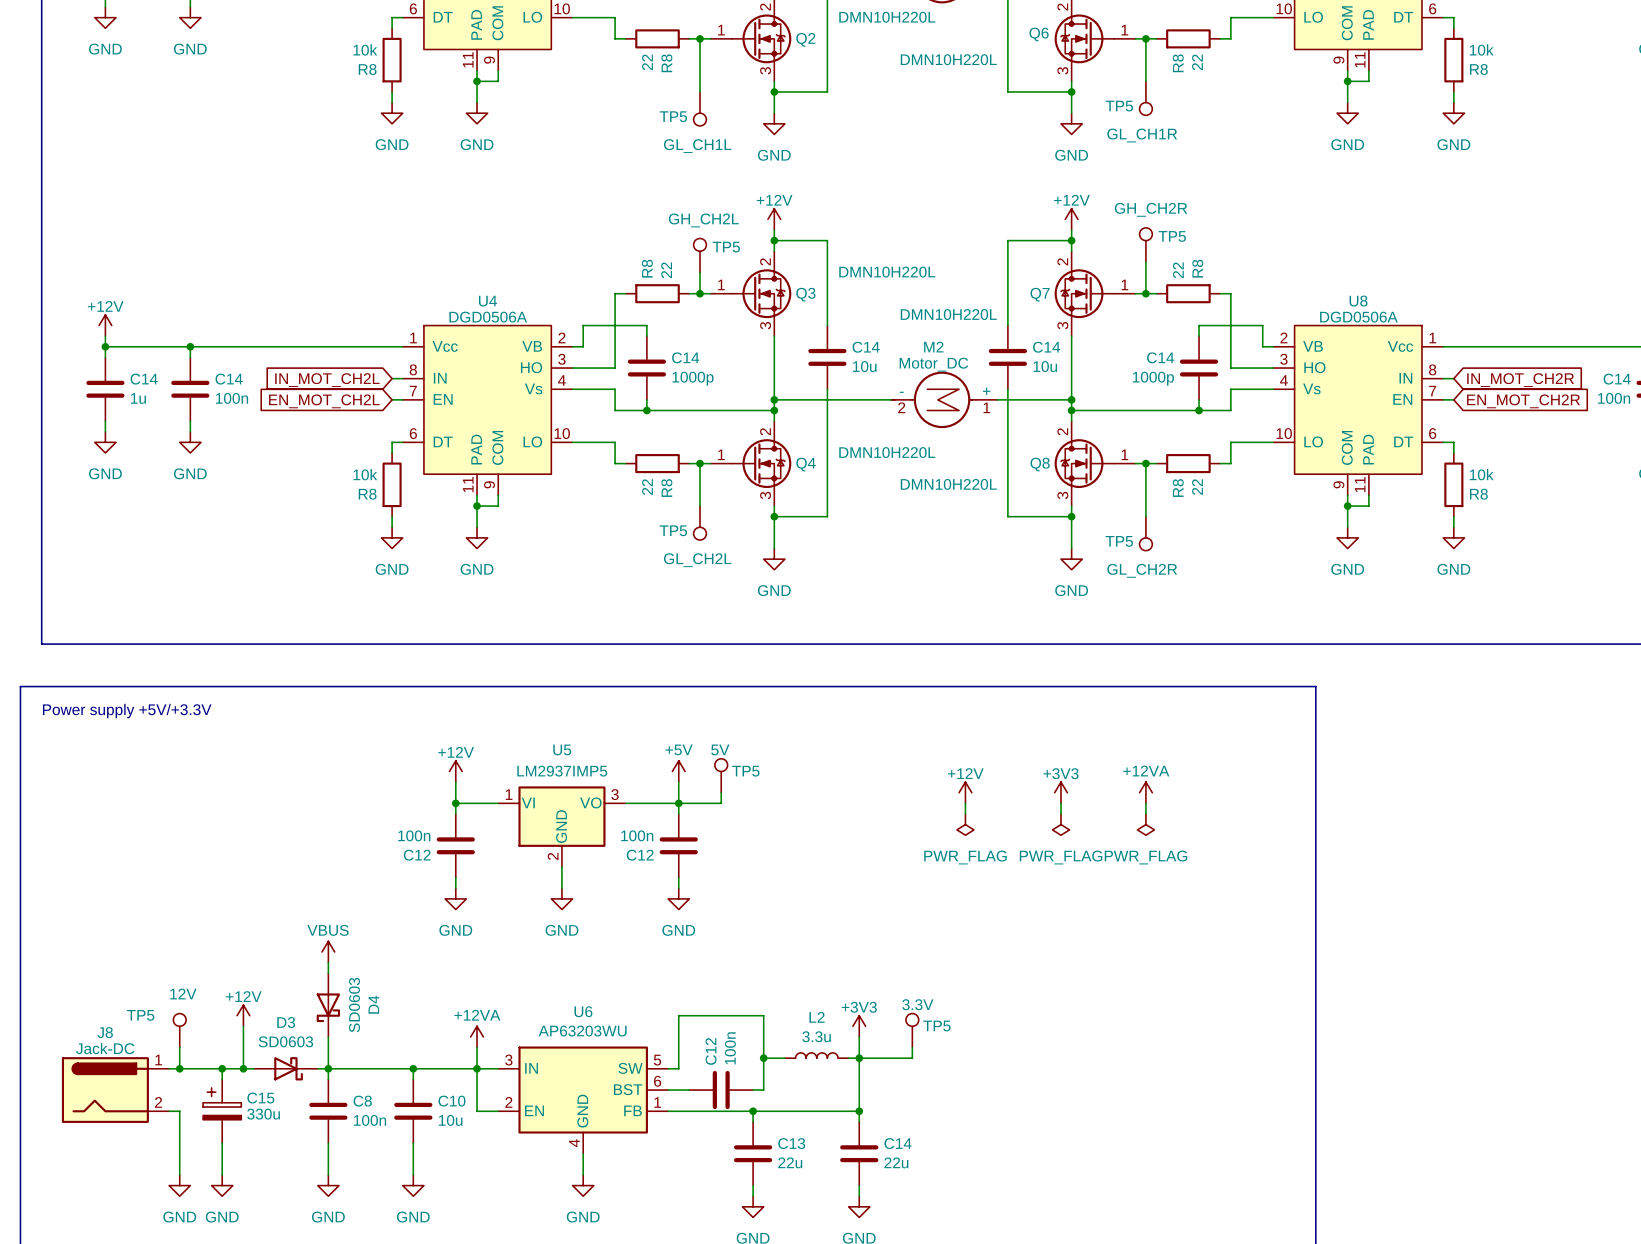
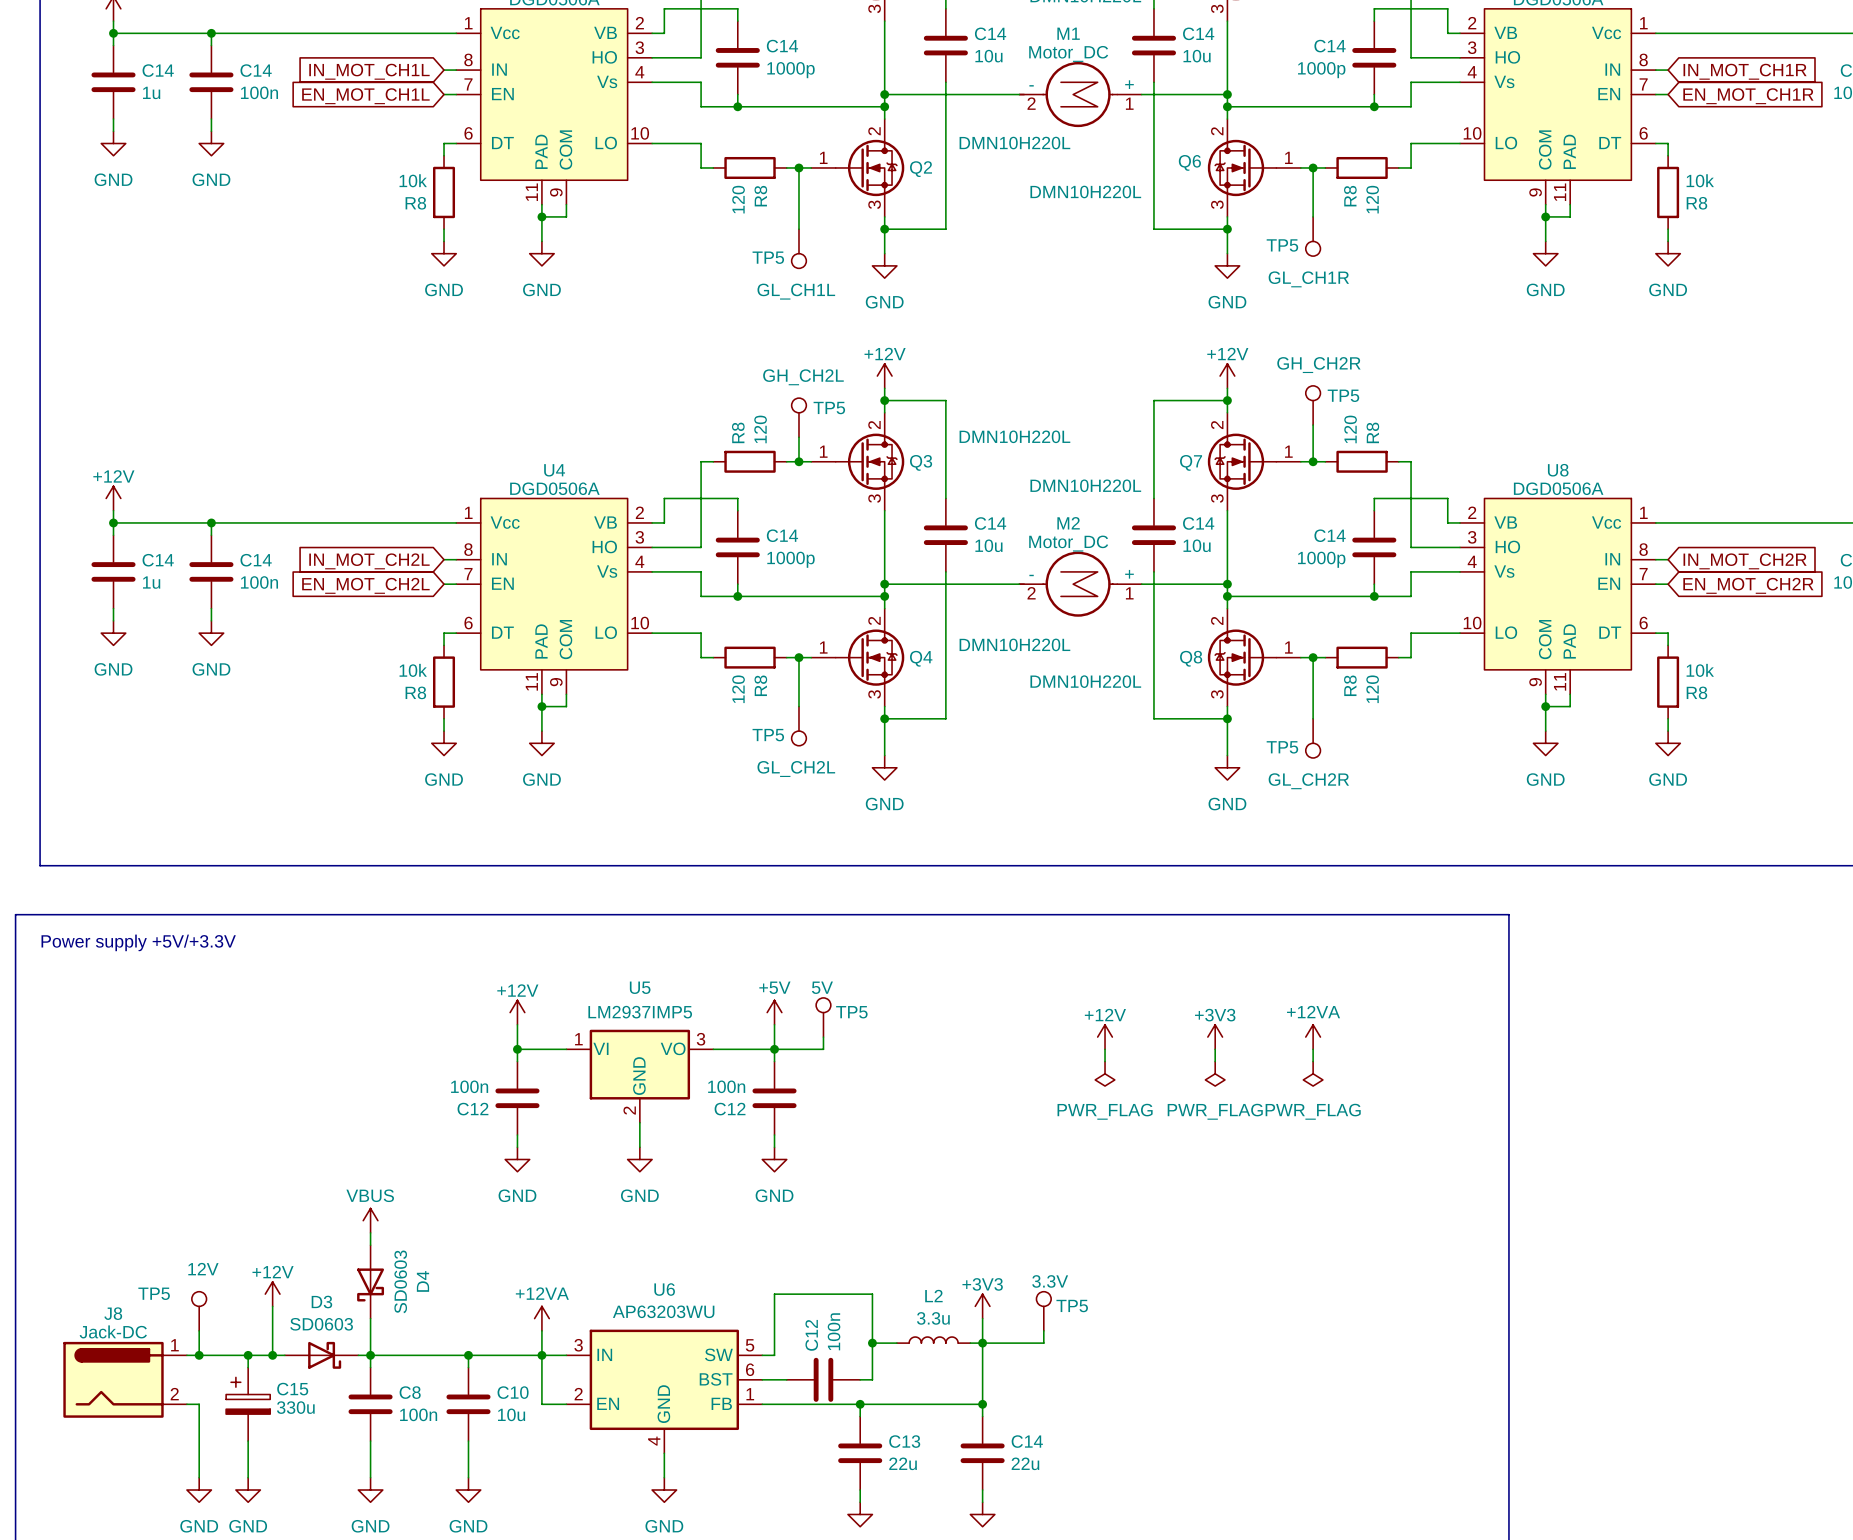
R8 value: 22 (647, 62) -> 120 (738, 199)
R8 value: 22 (1197, 62) -> 120 (1372, 199)
R8 value: 22 (666, 270) -> 120 (760, 429)
R8 value: 22 (1178, 270) -> 120 (1350, 429)
R8 value: 22 (647, 487) -> 120 (738, 689)
R8 value: 22 (1197, 487) -> 120 (1372, 689)

